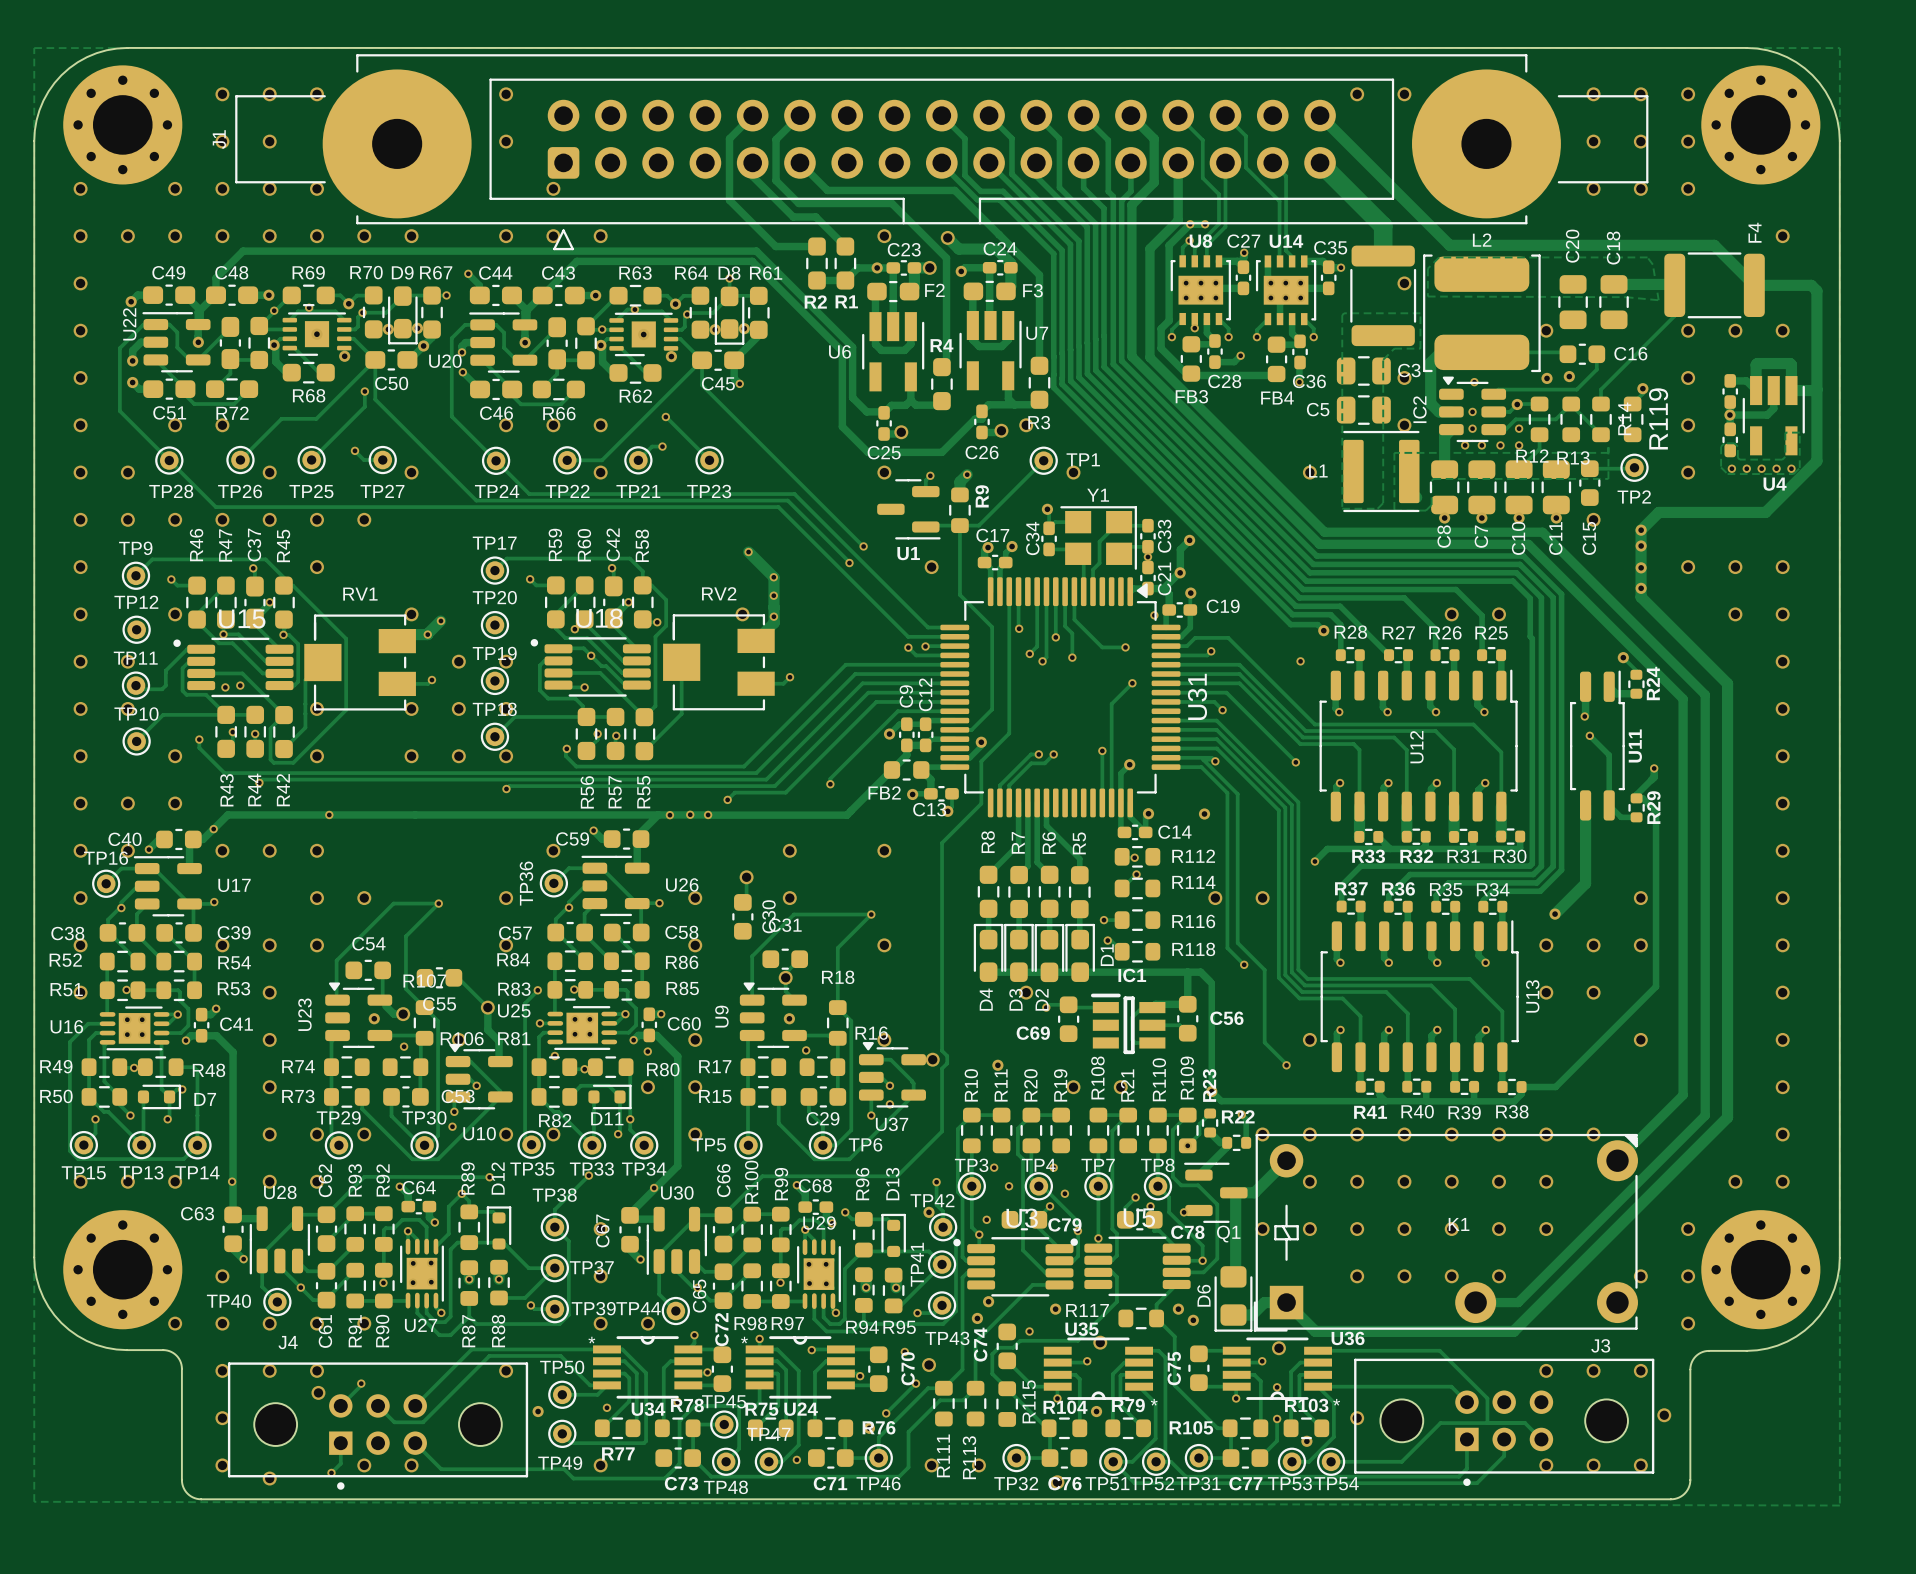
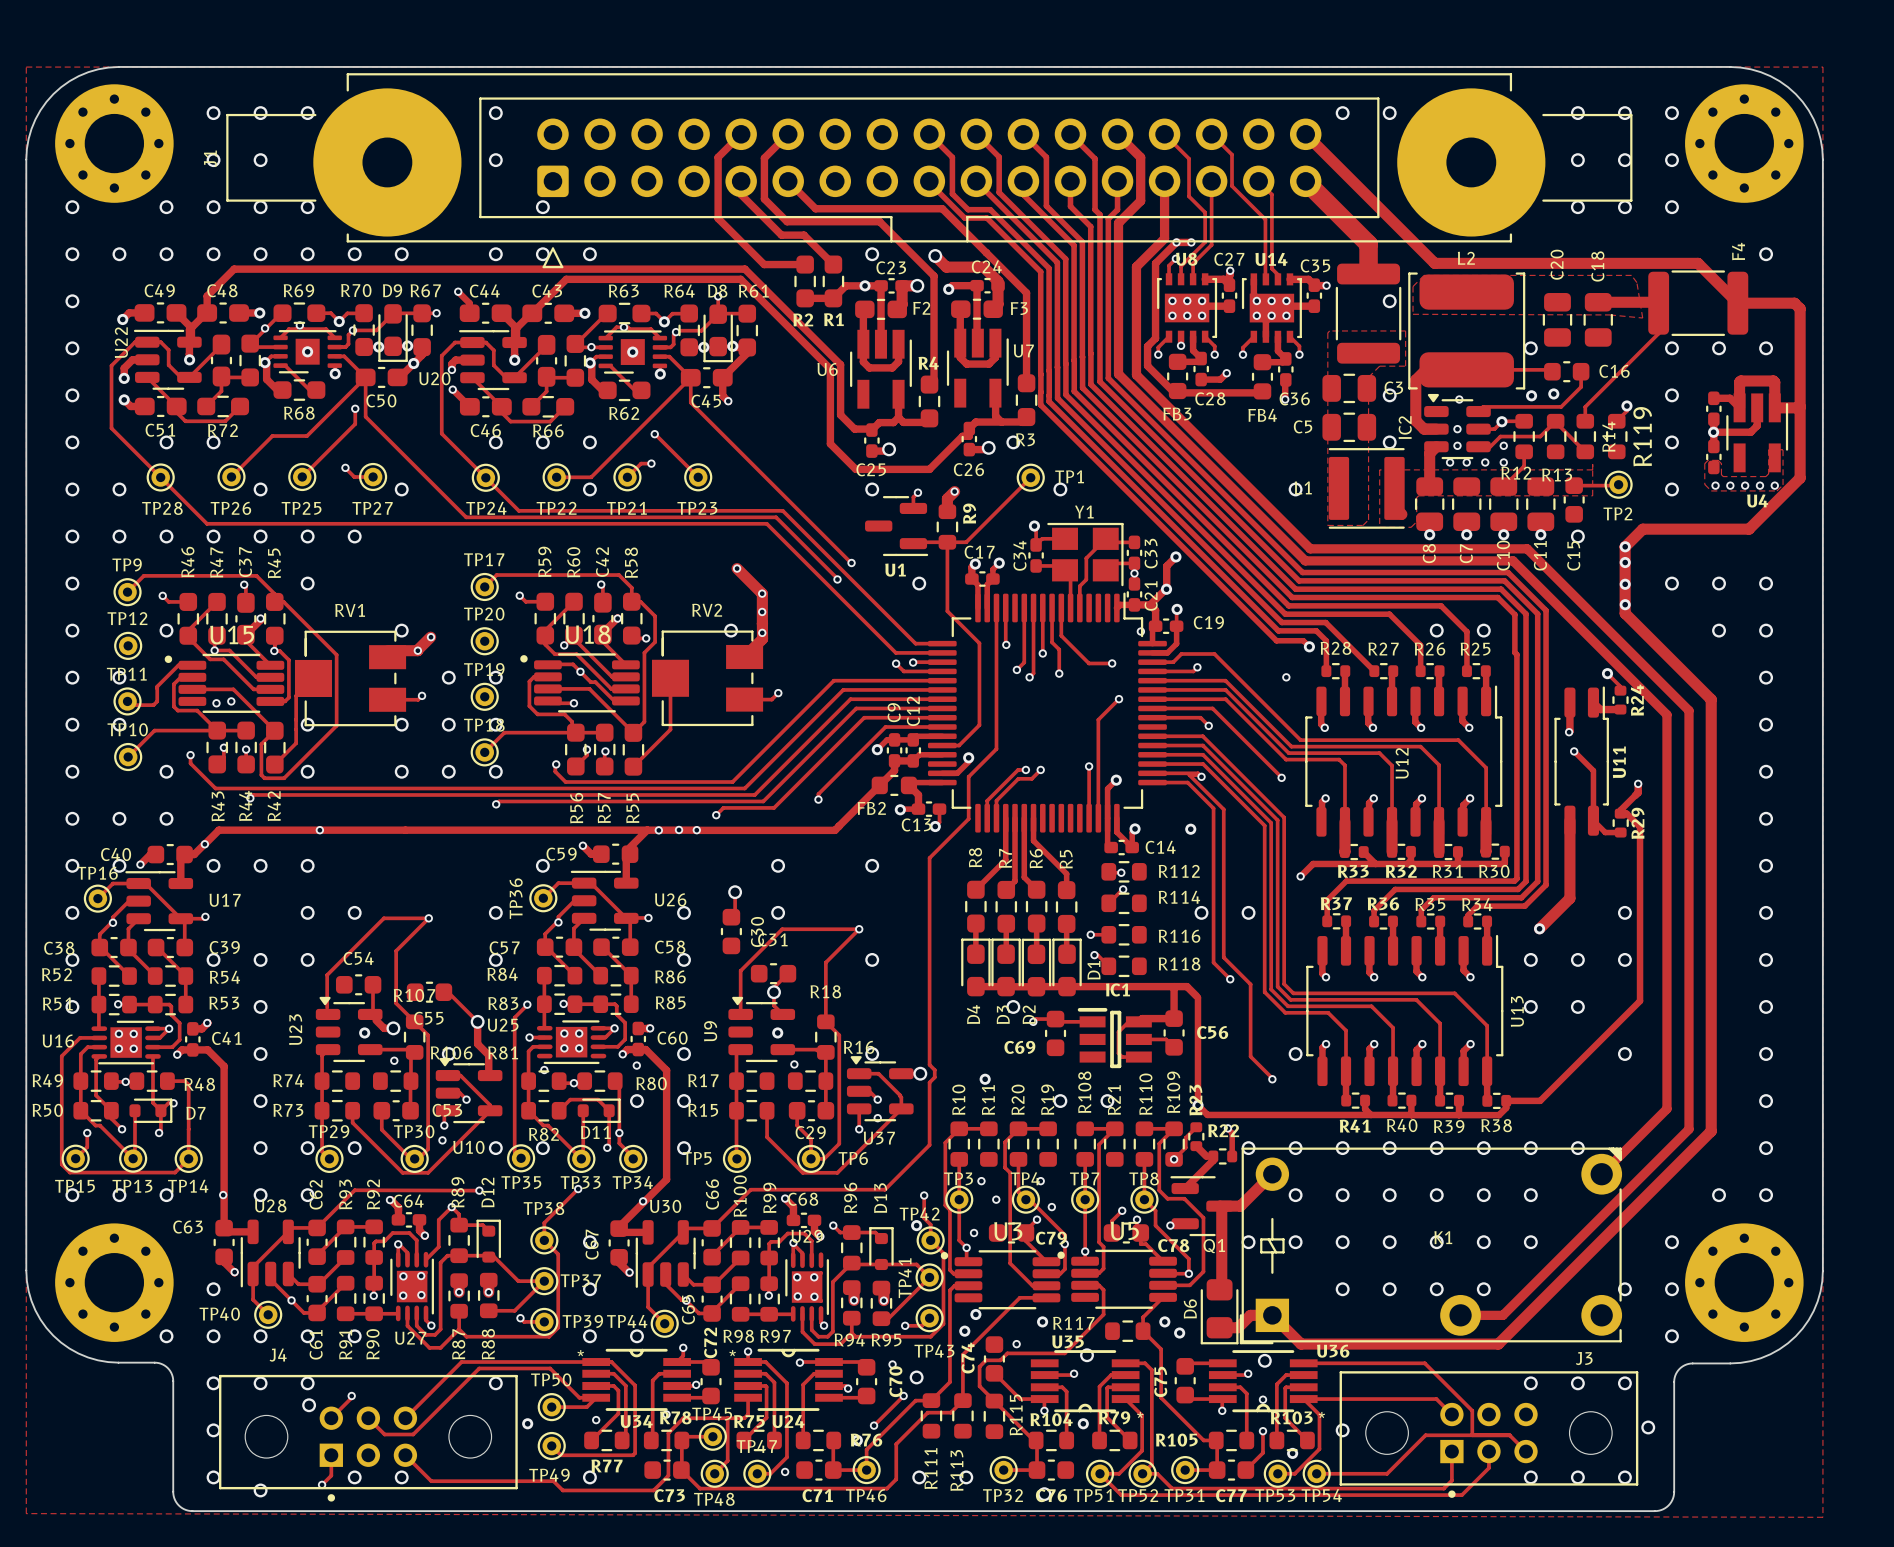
part: none -> (1047, 712)
U31: (1060, 697) -> none

